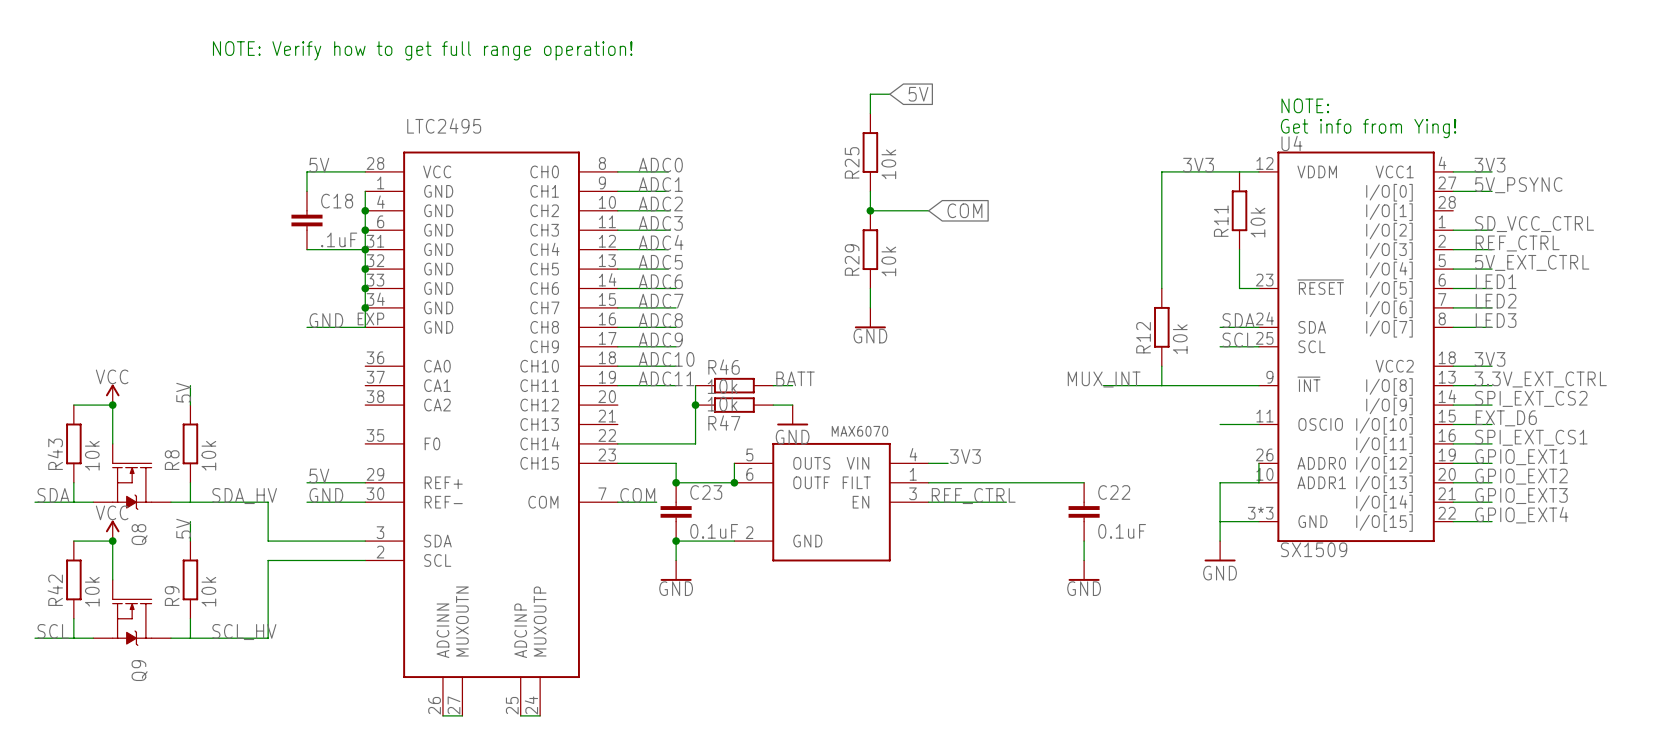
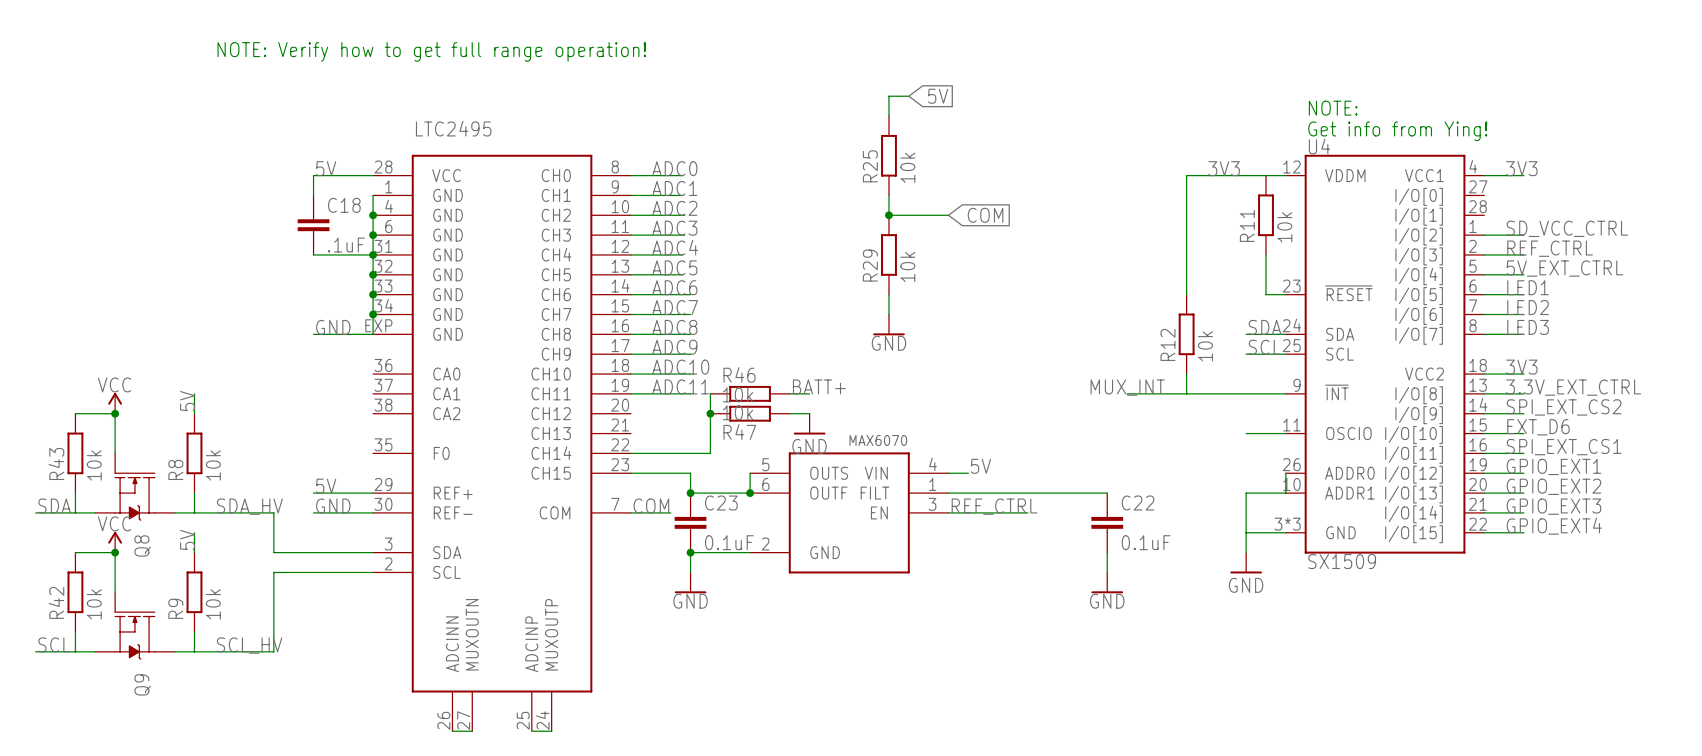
label: 5V_PSYNC (1518, 185) -> none
wire: (1453, 191) (1492, 191) -> none
label: BATT (795, 378) -> BATT+ (819, 386)
label: 3V3 (965, 456) -> 5V (980, 466)

